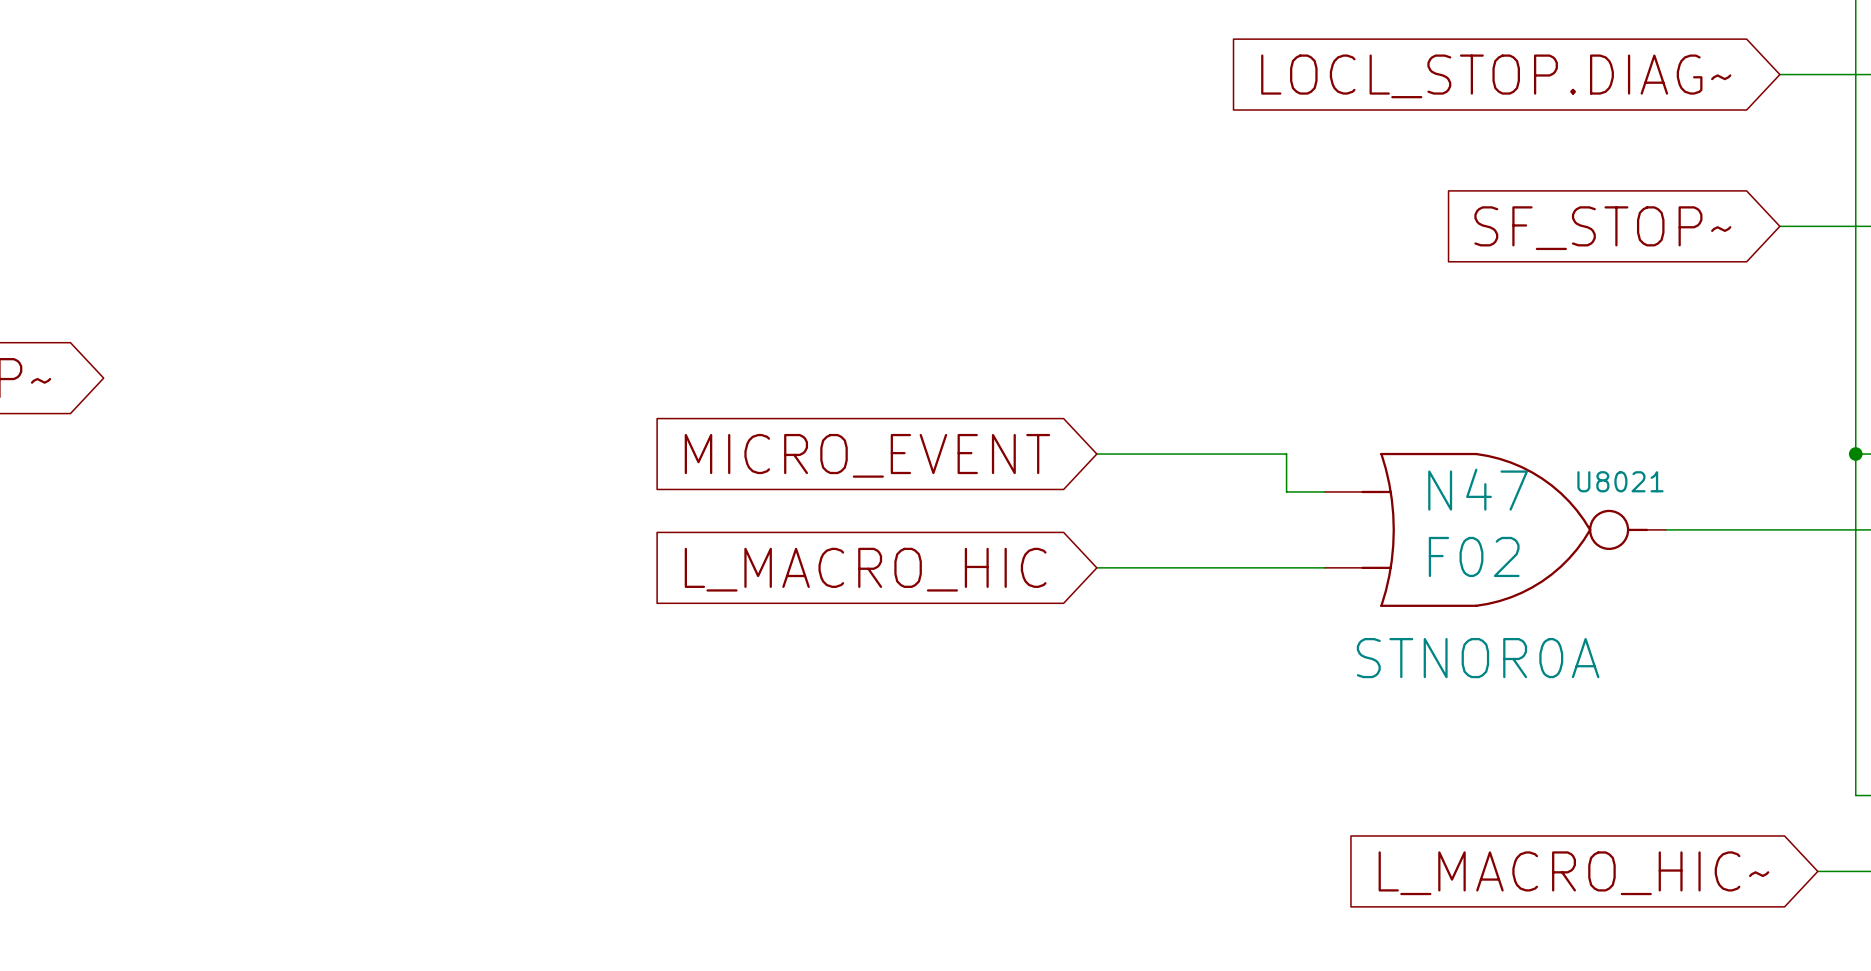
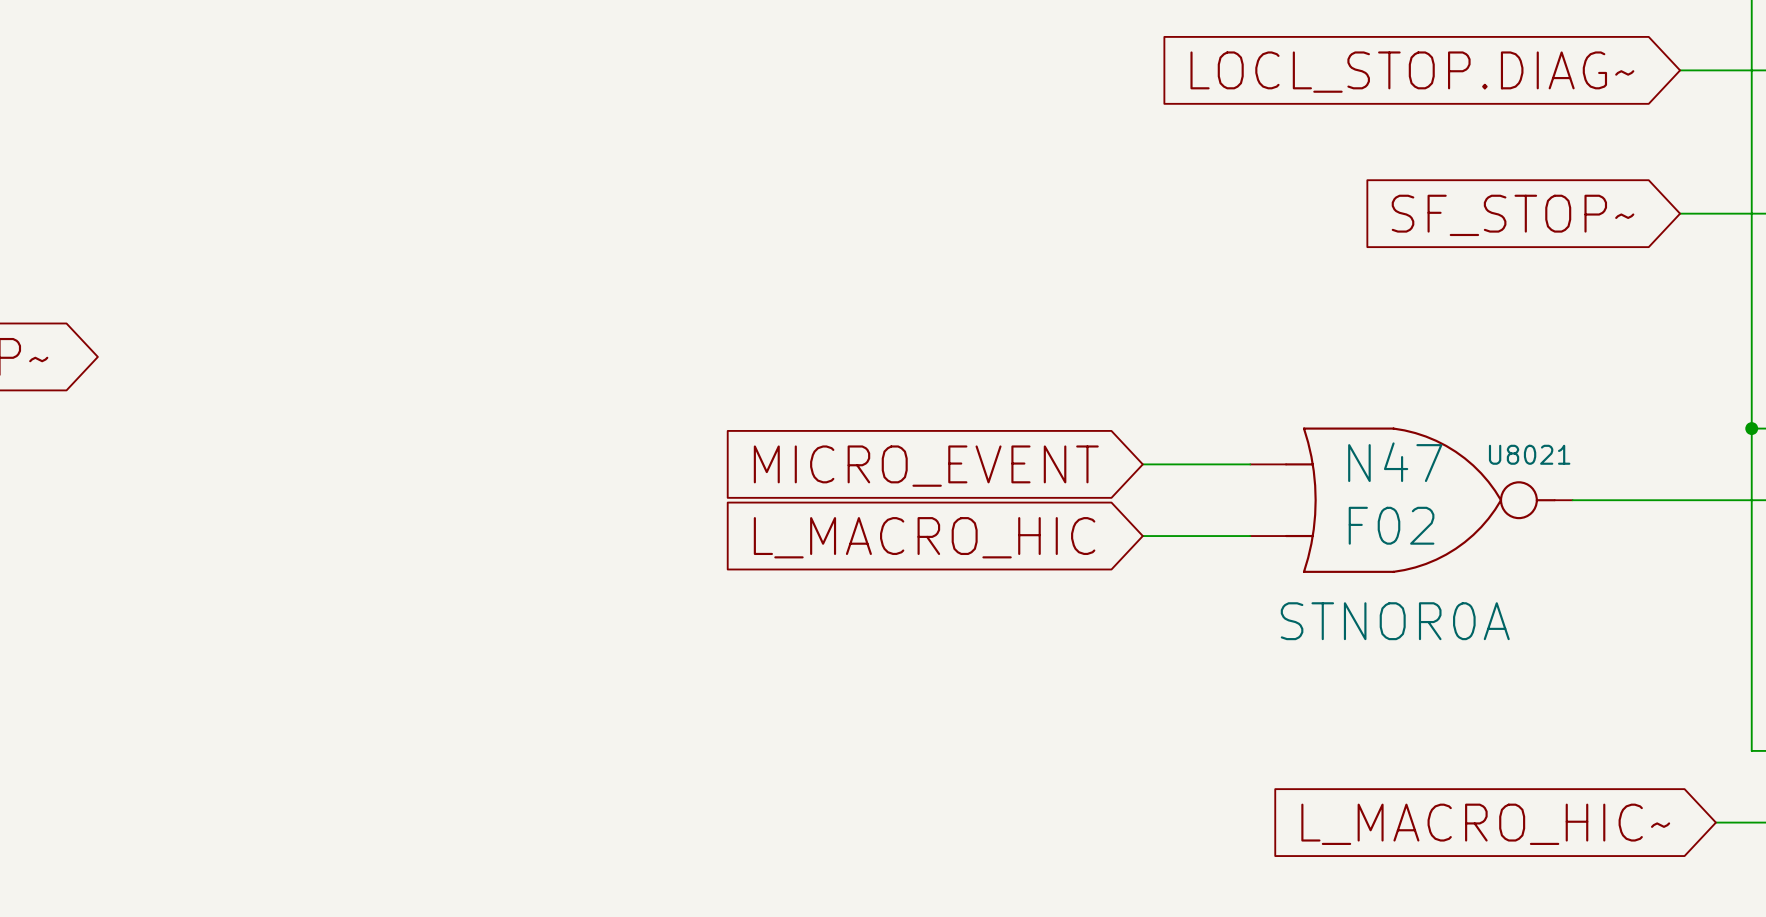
wire: (1096, 454) (1286, 454) (1286, 491) -> (1142, 464) (1214, 464)
global label position: MICRO_EVENT (867, 455) -> MICRO_EVENT (926, 466)
wire: (1096, 567) (1210, 567) -> none
global label position: L_MACRO_HIC (865, 569) -> L_MACRO_HIC (924, 537)

